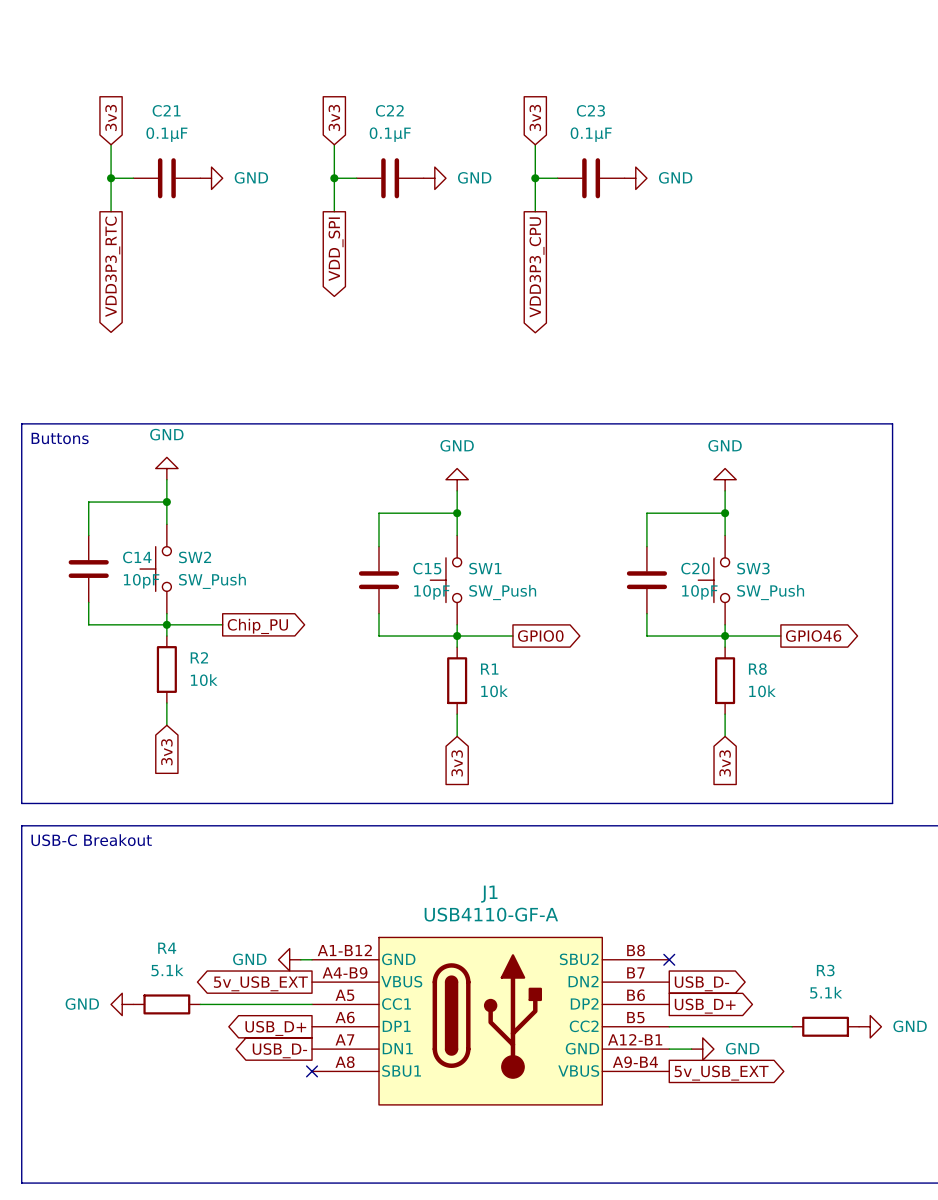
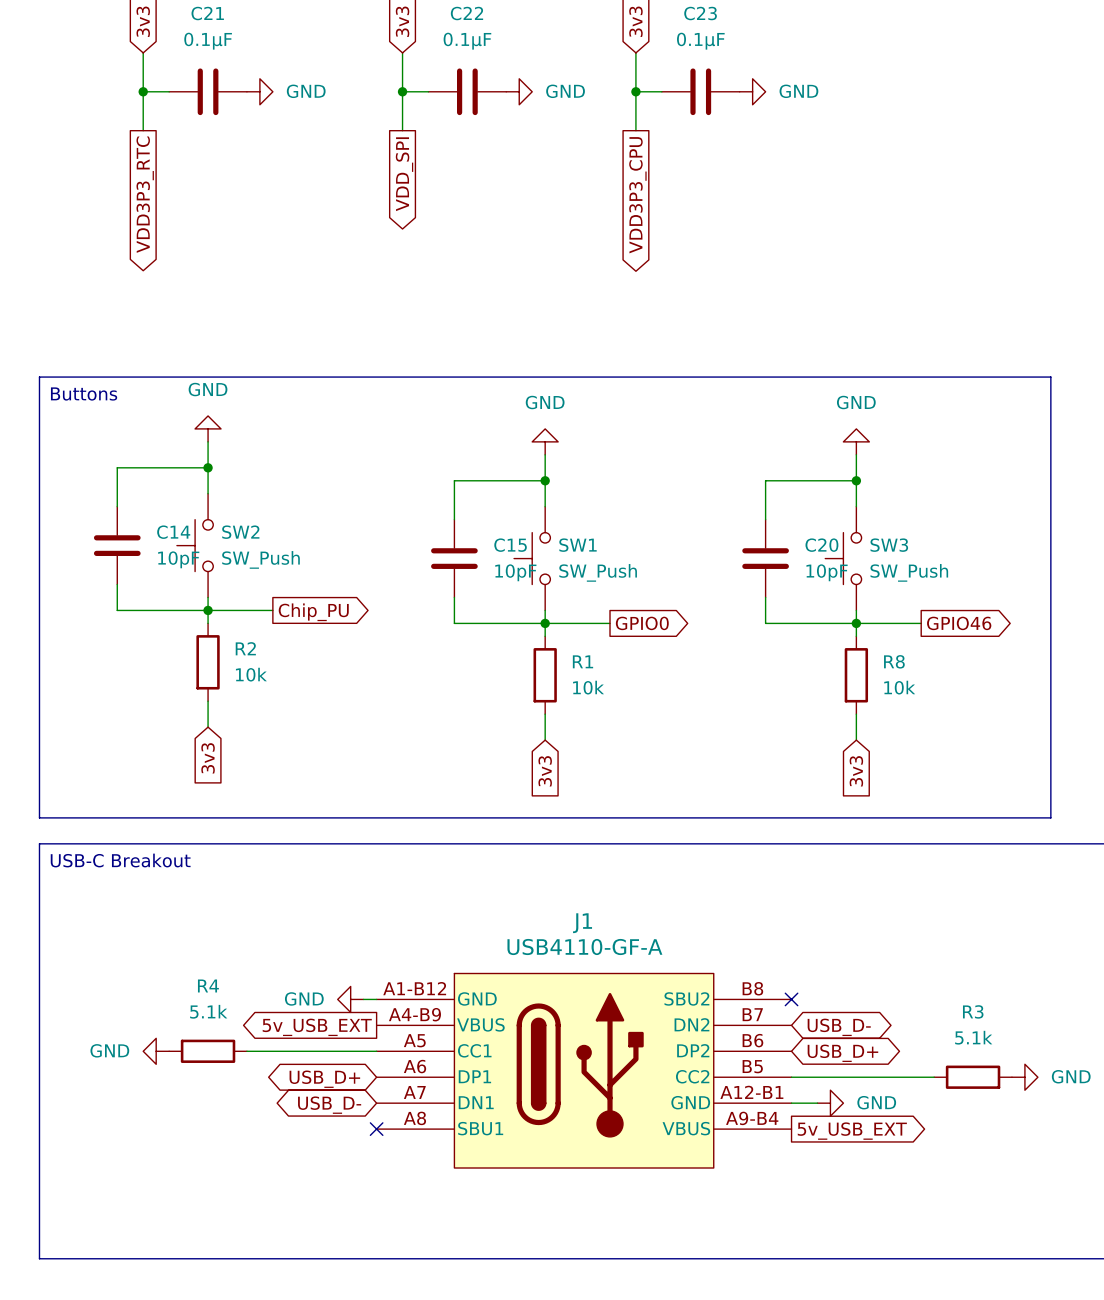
global label shape: output (701, 983) -> bidirectional (839, 1027)
global label shape: output (705, 1006) -> bidirectional (842, 1053)
global label shape: output (275, 1028) -> bidirectional (324, 1079)
global label shape: output (279, 1050) -> bidirectional (329, 1105)

